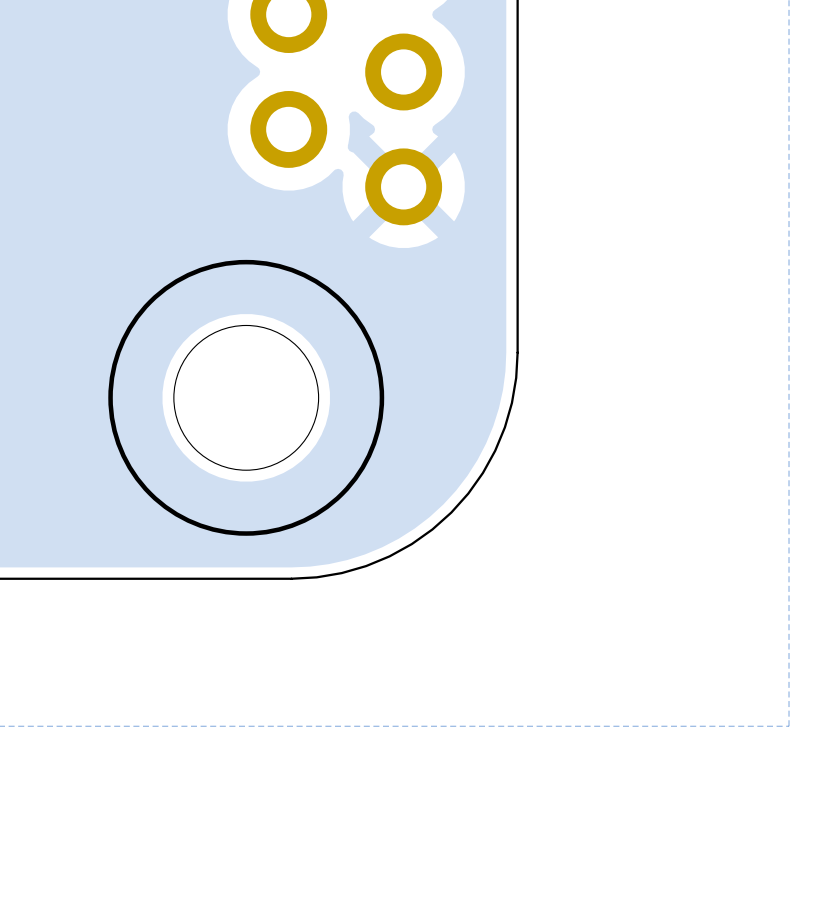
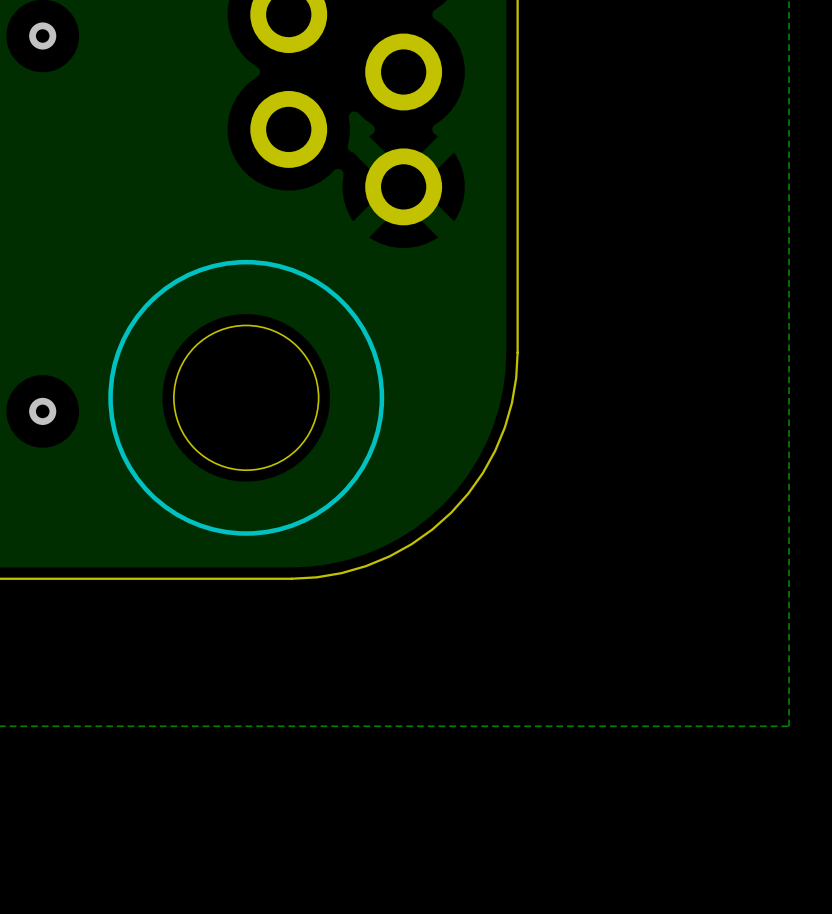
via: none -> (42, 35)
via: none -> (42, 411)

